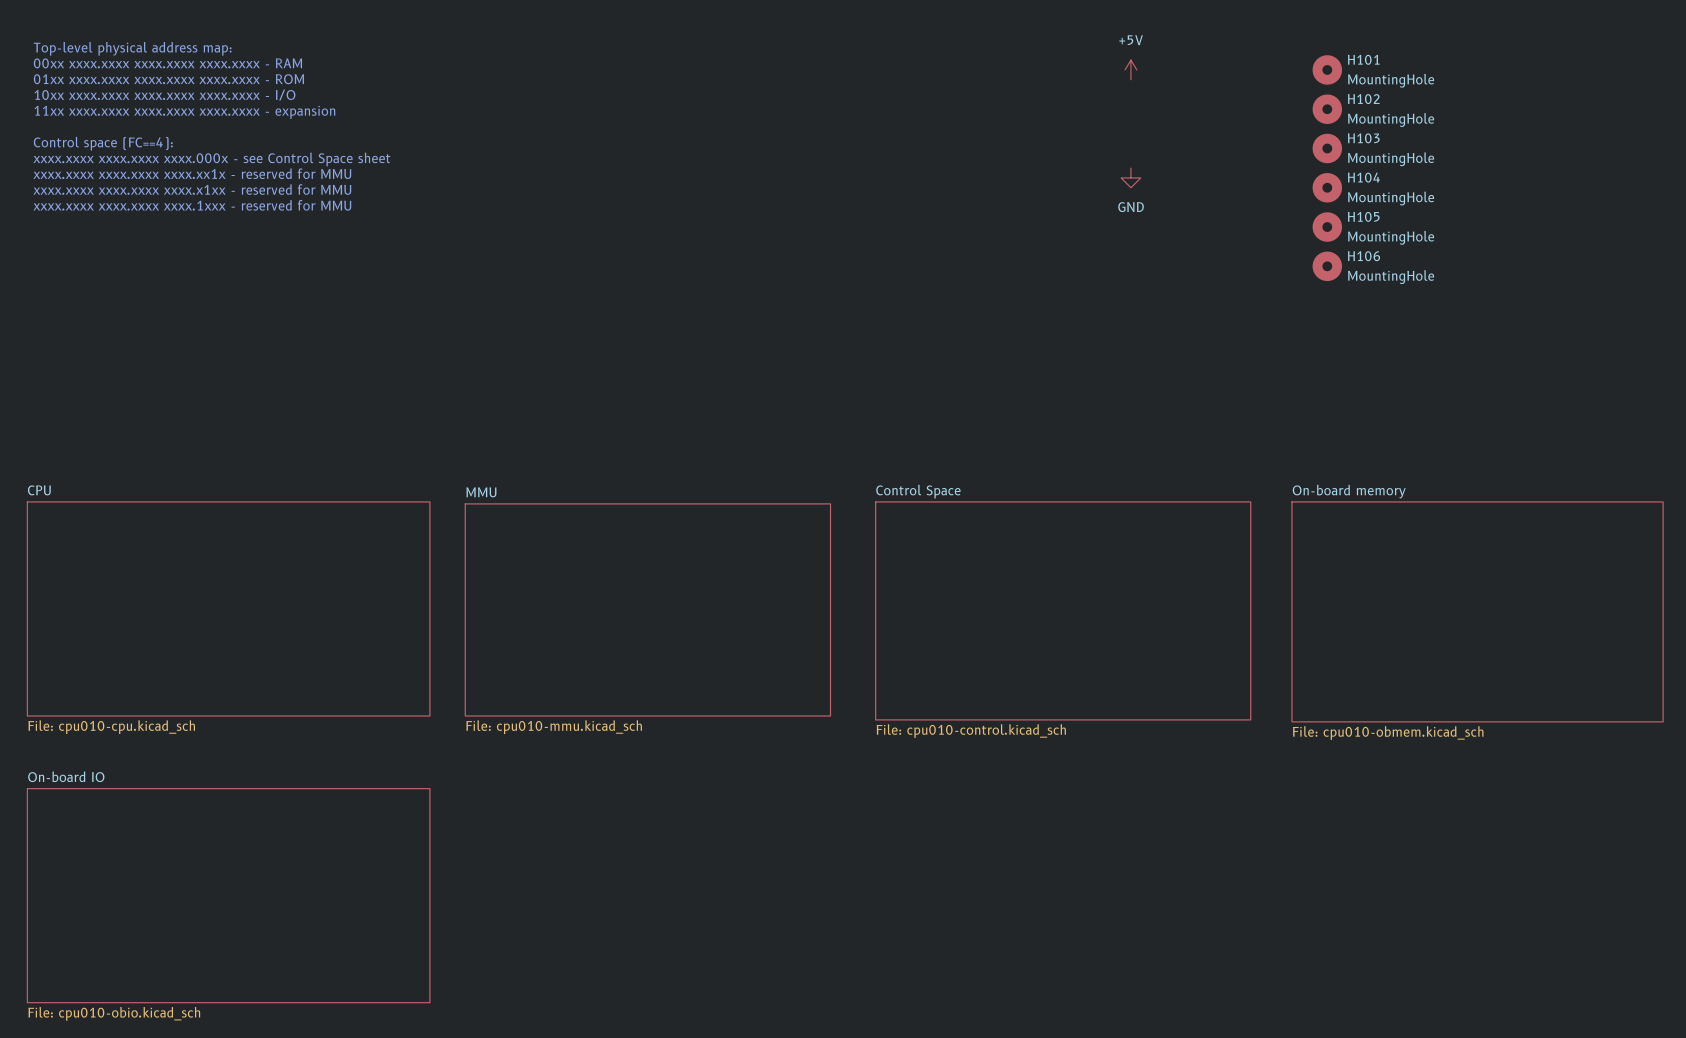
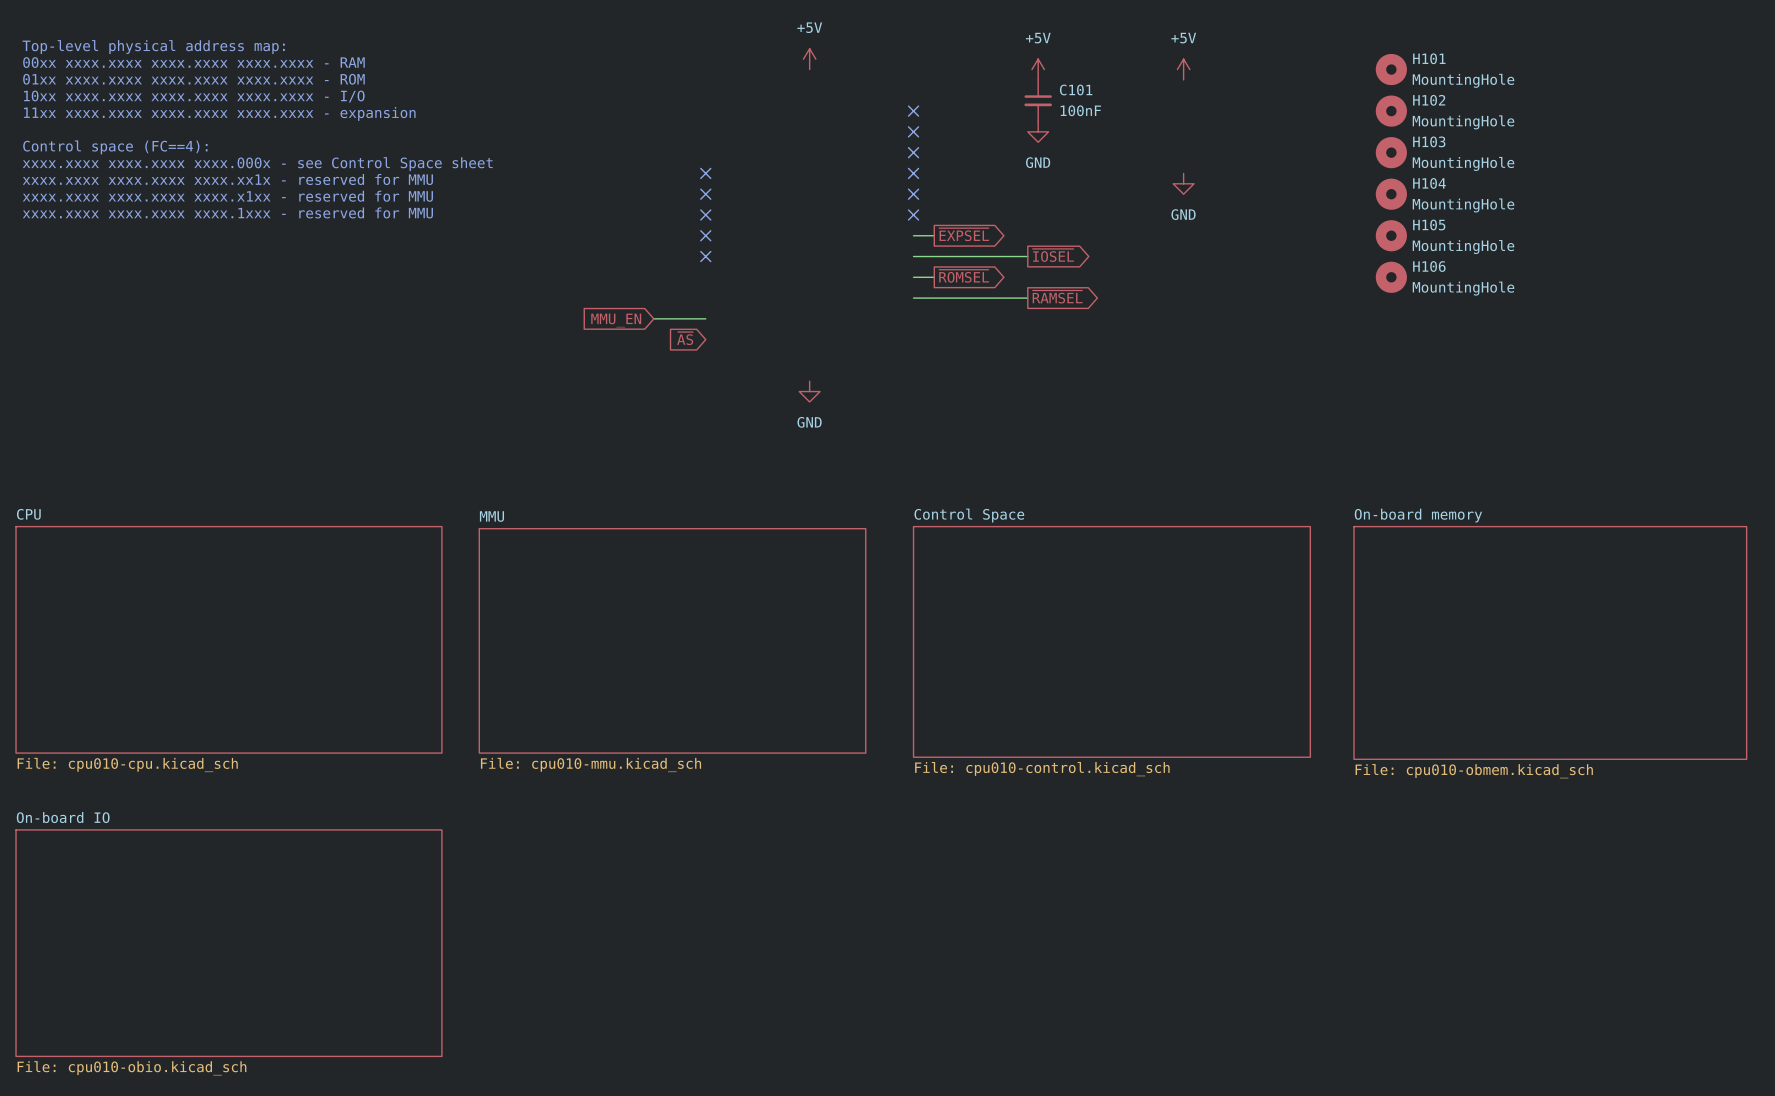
power symbol: none -> +5V (809, 59)
power symbol: none -> +5V (1038, 69)
C101: none -> 100nF (1038, 100)
no-connect mark: none -> (913, 111)
no-connect mark: none -> (913, 131)
power symbol: none -> GND (1038, 131)
no-connect mark: none -> (913, 152)
no-connect mark: none -> (705, 173)
no-connect mark: none -> (913, 173)
no-connect mark: none -> (705, 194)
no-connect mark: none -> (913, 194)
no-connect mark: none -> (705, 214)
no-connect mark: none -> (913, 214)
global label: none -> ~{EXPSEL} (964, 234)
no-connect mark: none -> (705, 235)
wire: none -> (913, 235) (934, 235)
global label: none -> ~{IOSEL} (1053, 255)
no-connect mark: none -> (705, 256)
wire: none -> (913, 256) (1027, 256)
global label: none -> ~{ROMSEL} (964, 276)
wire: none -> (913, 277) (934, 277)
global label: none -> ~{RAMSEL} (1057, 296)
wire: none -> (913, 298) (1027, 298)
wire: none -> (653, 318) (705, 318)
global label: none -> MMU_EN (616, 320)
global label: none -> ~{AS} (685, 338)
power symbol: none -> GND (809, 391)

